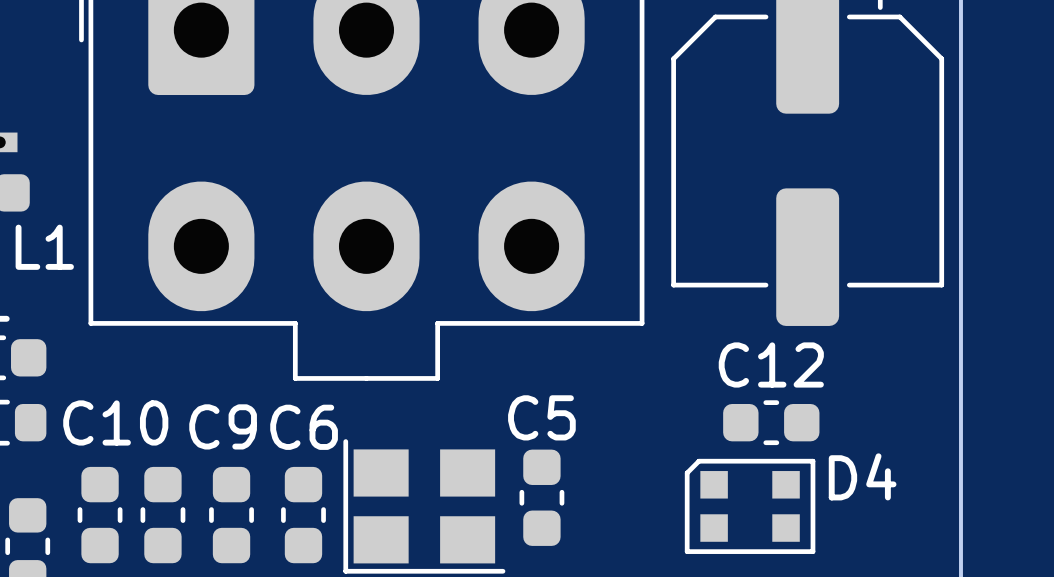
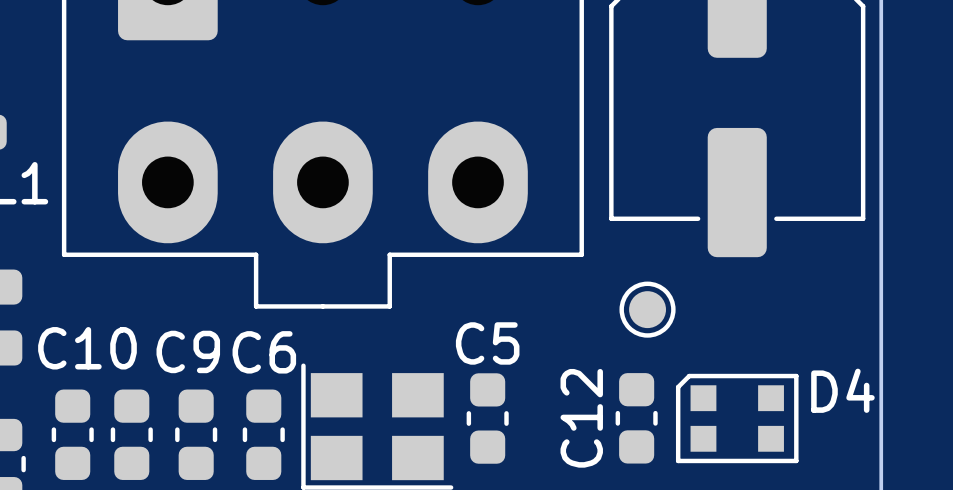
C12 name position: C12 (771, 364) -> C12 (581, 418)
part: none -> (647, 309)
C12 rotation: 0° (771, 422) -> 90° clockwise (636, 418)
C12 position: (771, 422) -> (636, 418)
D4 position: (750, 506) -> (737, 418)

